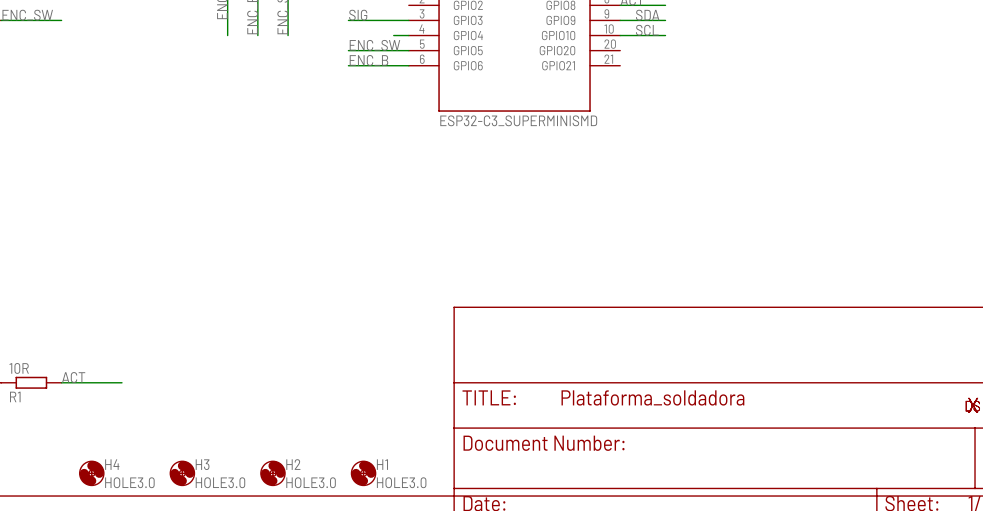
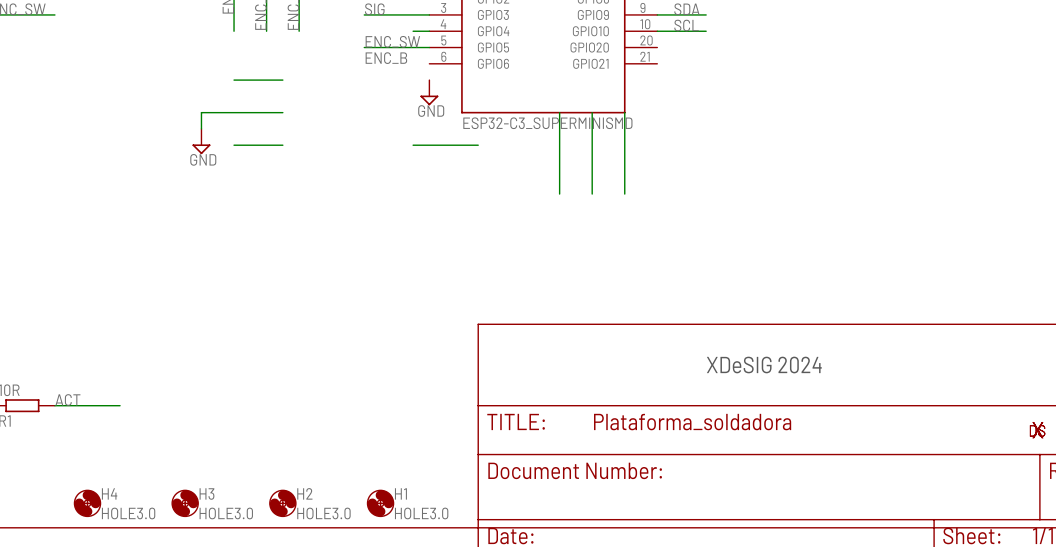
wire: (348, 65) (408, 65) -> (413, 145) (478, 145)
wire: none -> (234, 80) (282, 80)
power symbol: none -> GND (429, 92)
wire: none -> (282, 112) (201, 112) (201, 128)
wire: none -> (559, 112) (559, 194)
wire: none -> (592, 112) (592, 194)
wire: none -> (624, 112) (624, 194)
power symbol: none -> GND (201, 141)
wire: none -> (234, 145) (282, 145)
text: none -> XDeSIG 2024 (764, 365)

